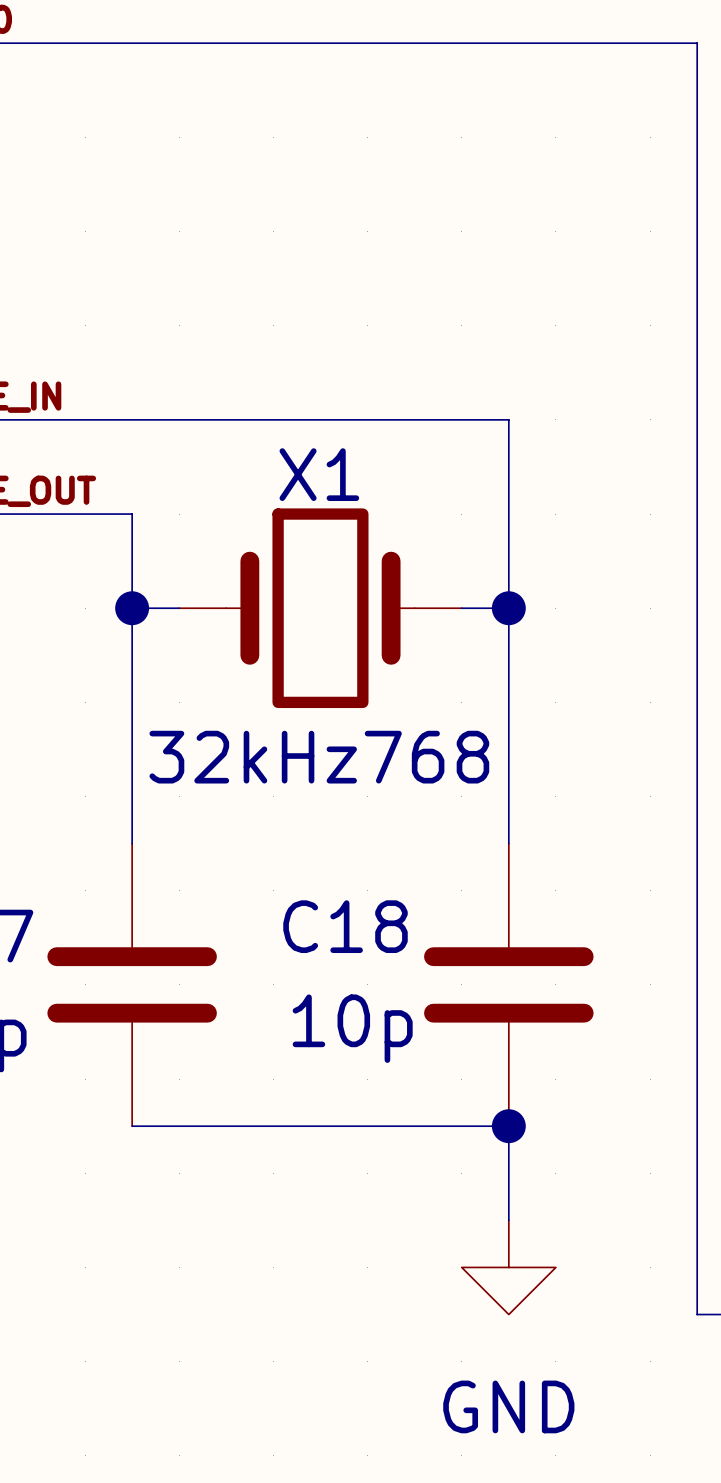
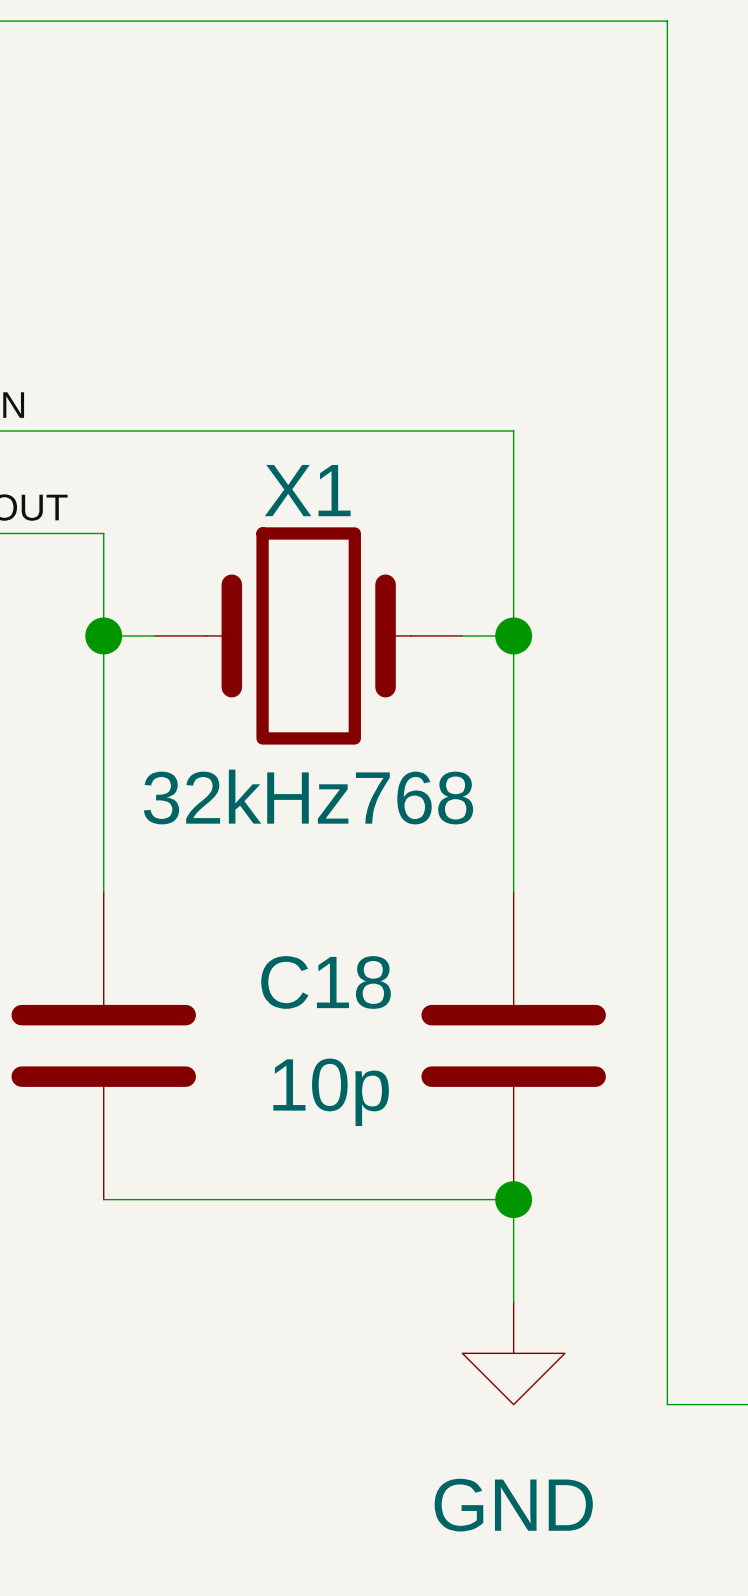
wire: (650, 43) (697, 43) (697, 1314) -> (667, 21) (667, 1404) (718, 1404)

